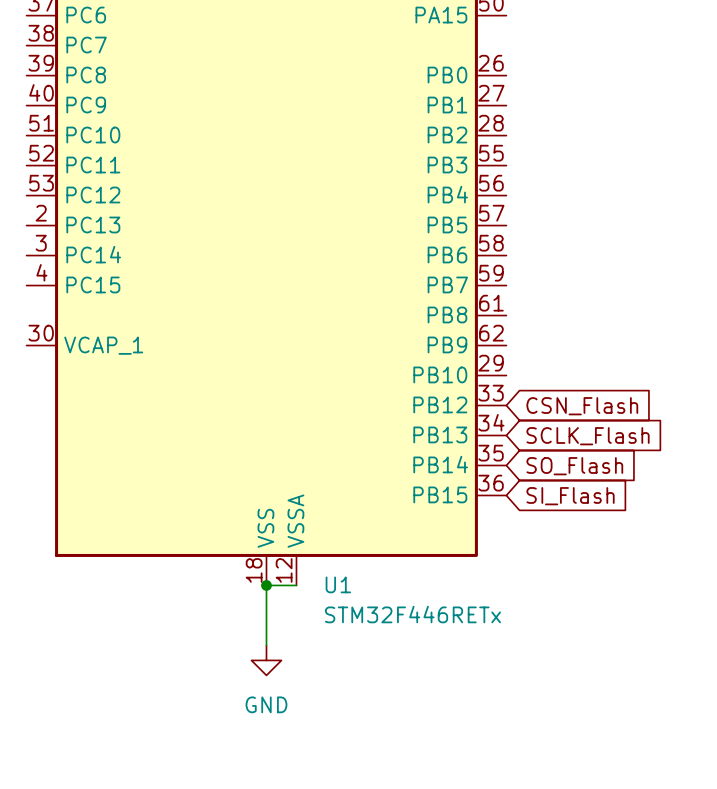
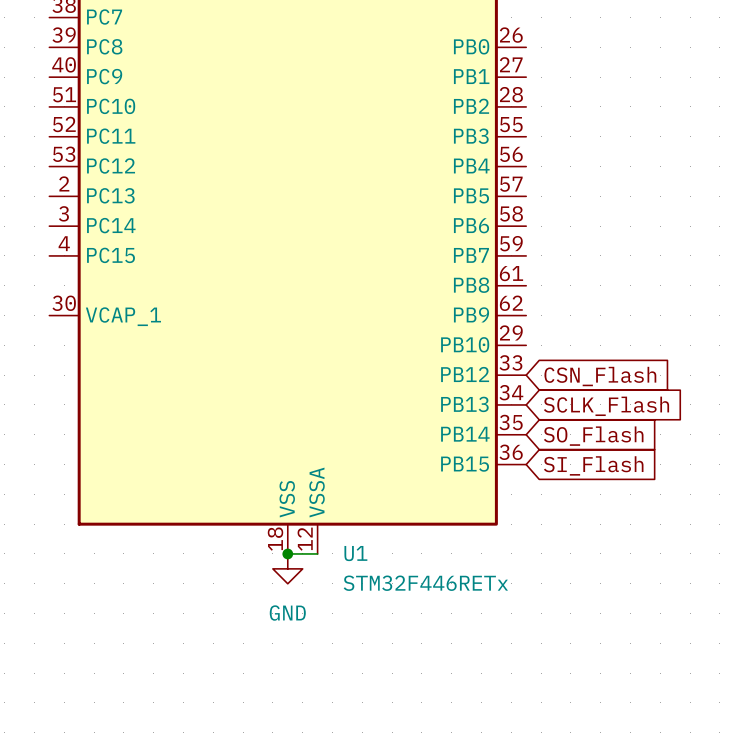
wire: (266, 585) (266, 645) -> none
power symbol position: GND (266, 660) -> GND (287, 568)

